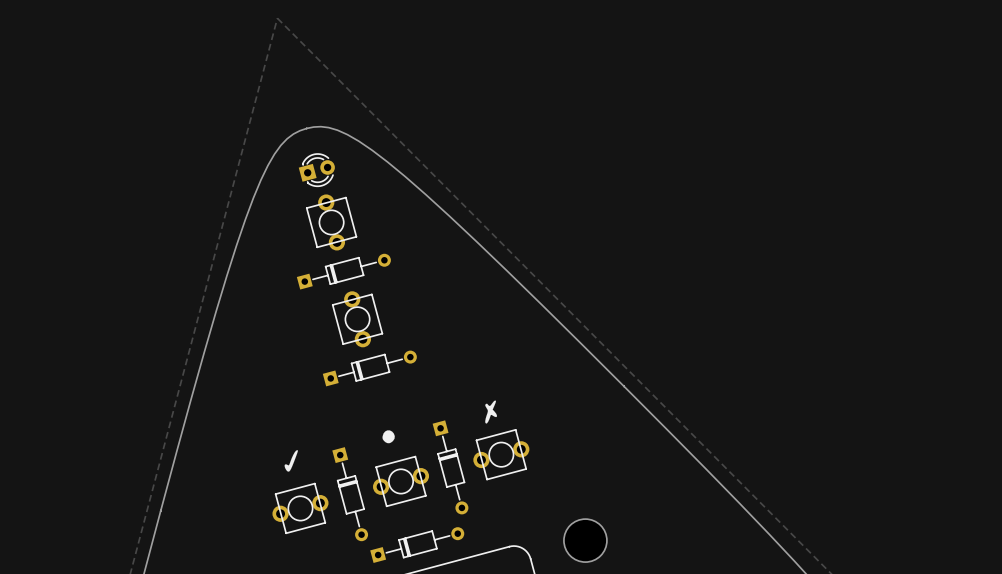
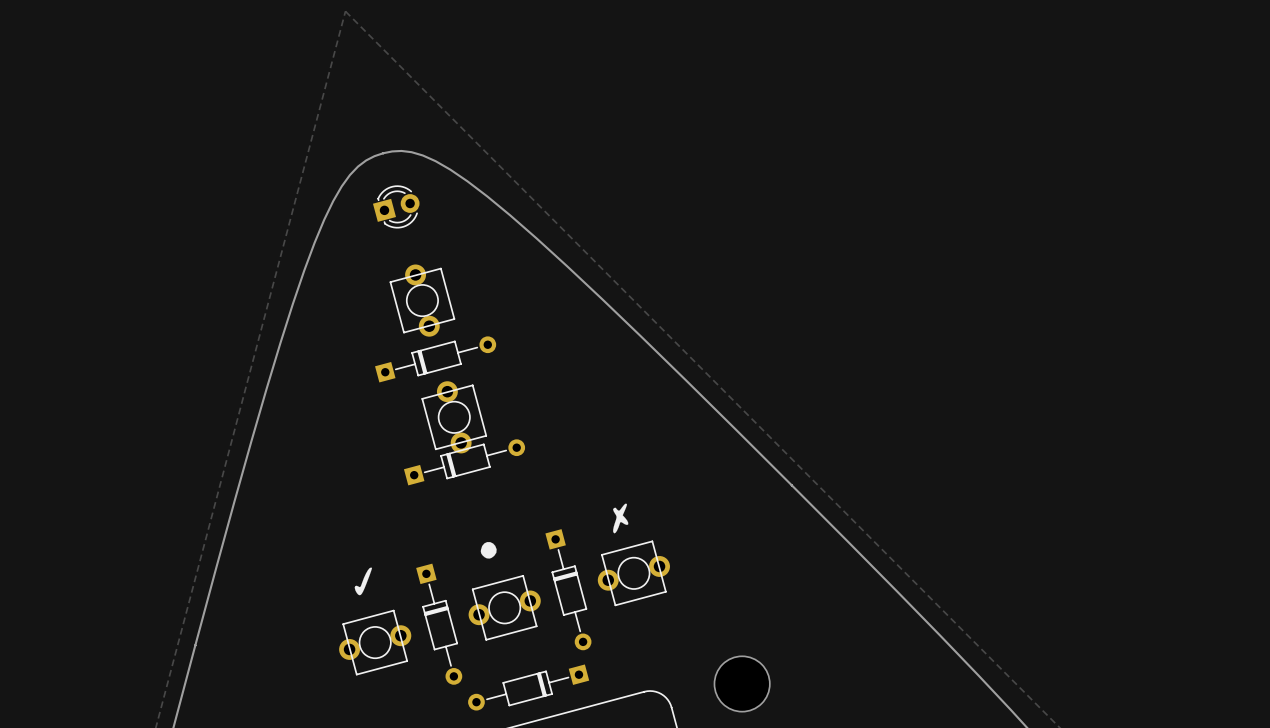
part position: (331, 222) -> (422, 300)
part position: (343, 271) -> (435, 359)
part position: (357, 319) -> (454, 417)
part rotation: 0° (417, 545) -> 180° (528, 687)

